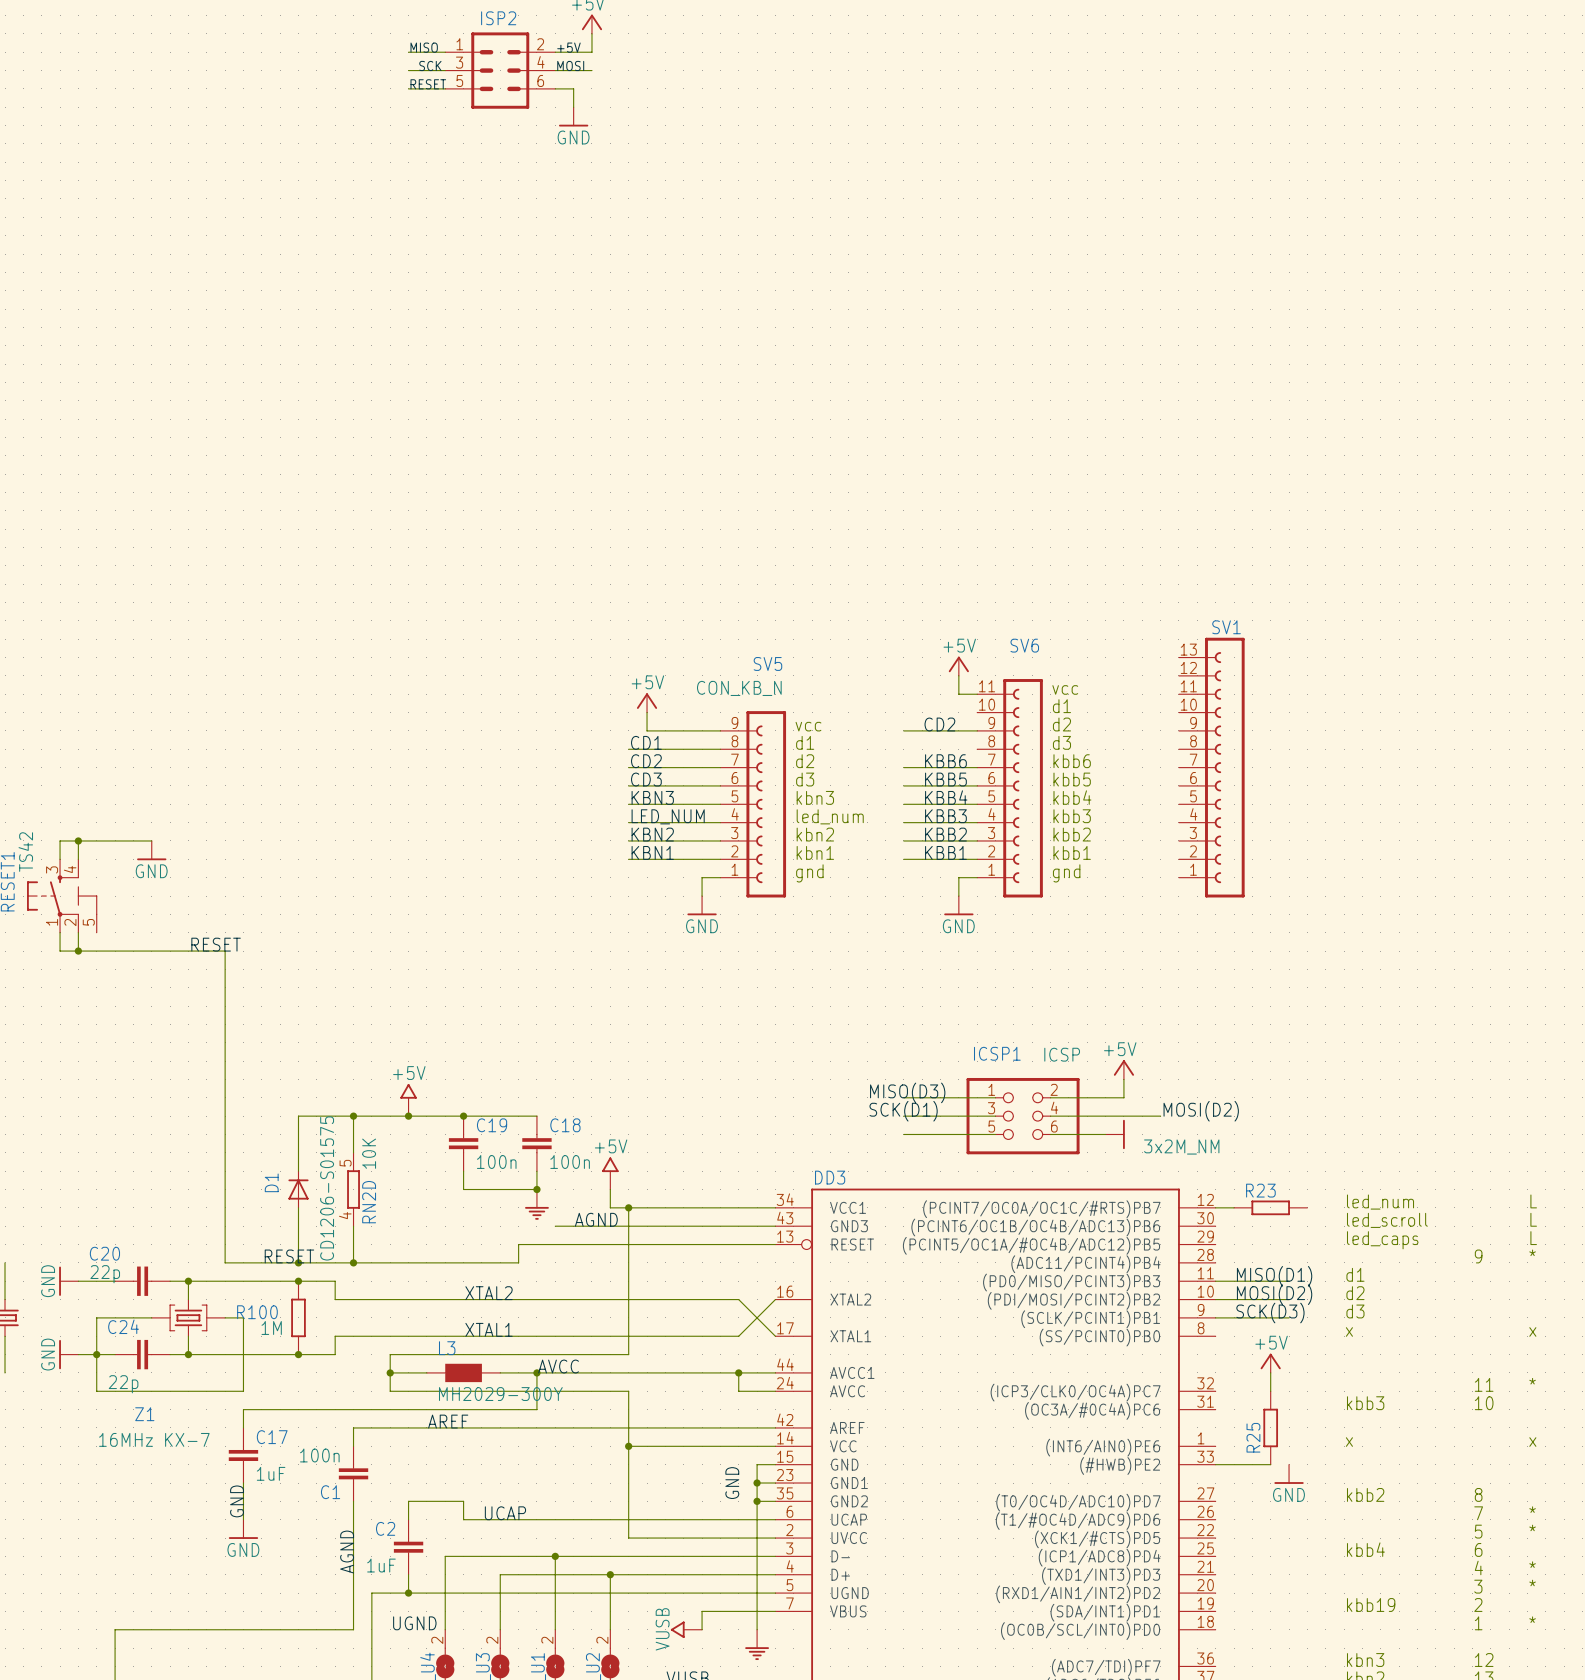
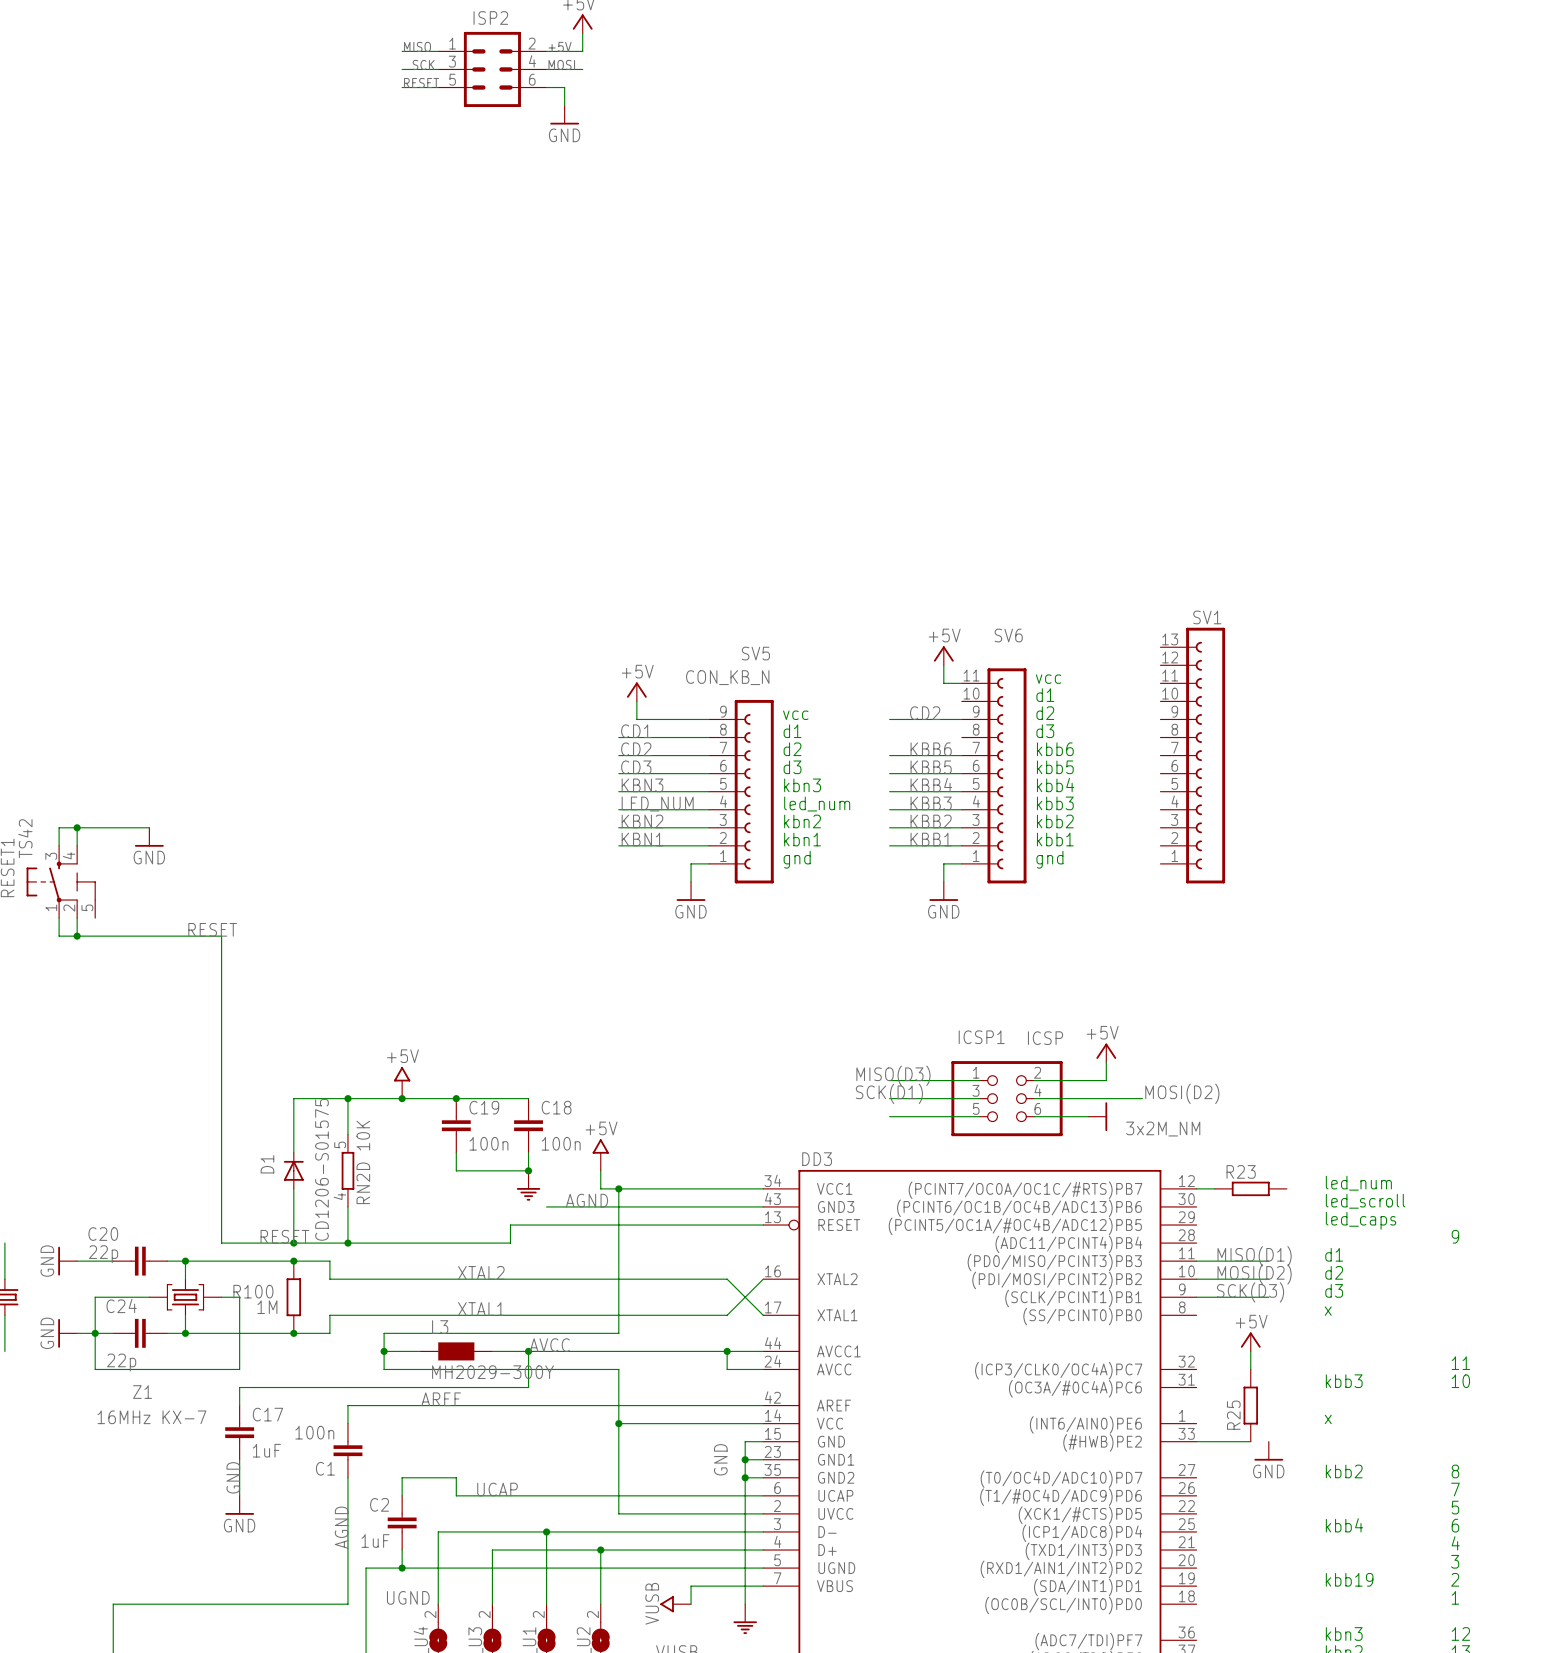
text: L (1533, 1201) -> none
text: L (1533, 1219) -> none
text: L (1533, 1238) -> none
text: * (1532, 1252) -> none
text: x (1532, 1331) -> none
text: * (1532, 1381) -> none
text: x (1532, 1442) -> none
text: * (1532, 1509) -> none
text: * (1532, 1527) -> none
text: * (1532, 1564) -> none
text: * (1532, 1582) -> none
text: * (1532, 1619) -> none

